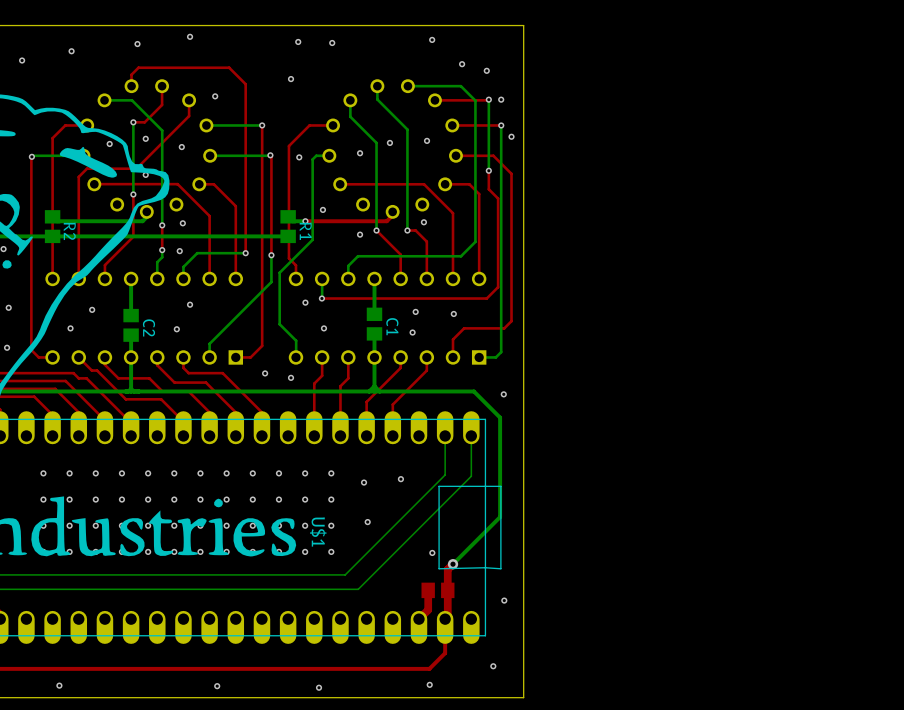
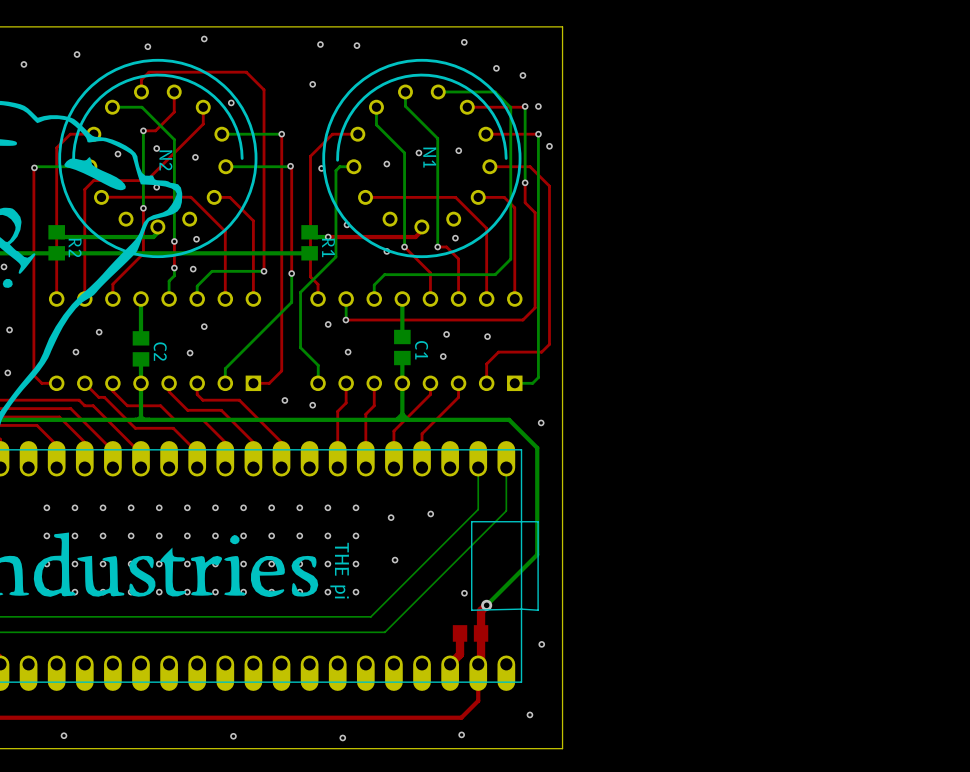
N2: none -> (157, 158)
N1: none -> (421, 158)
U$1 name: U$1 (318, 531) -> THE pi (339, 570)

